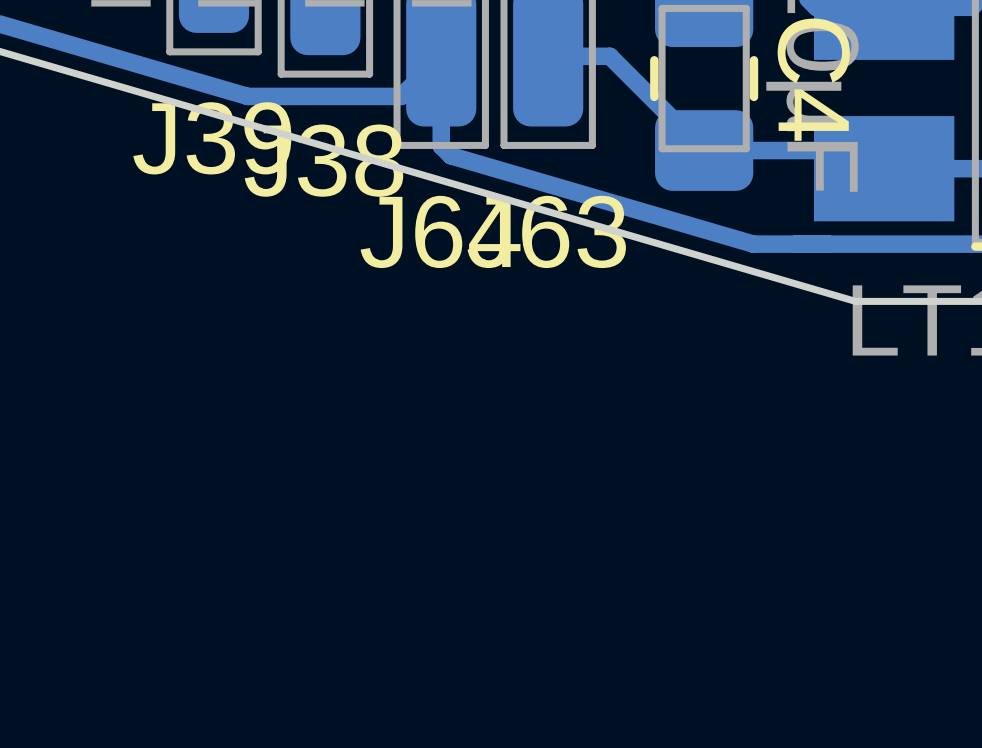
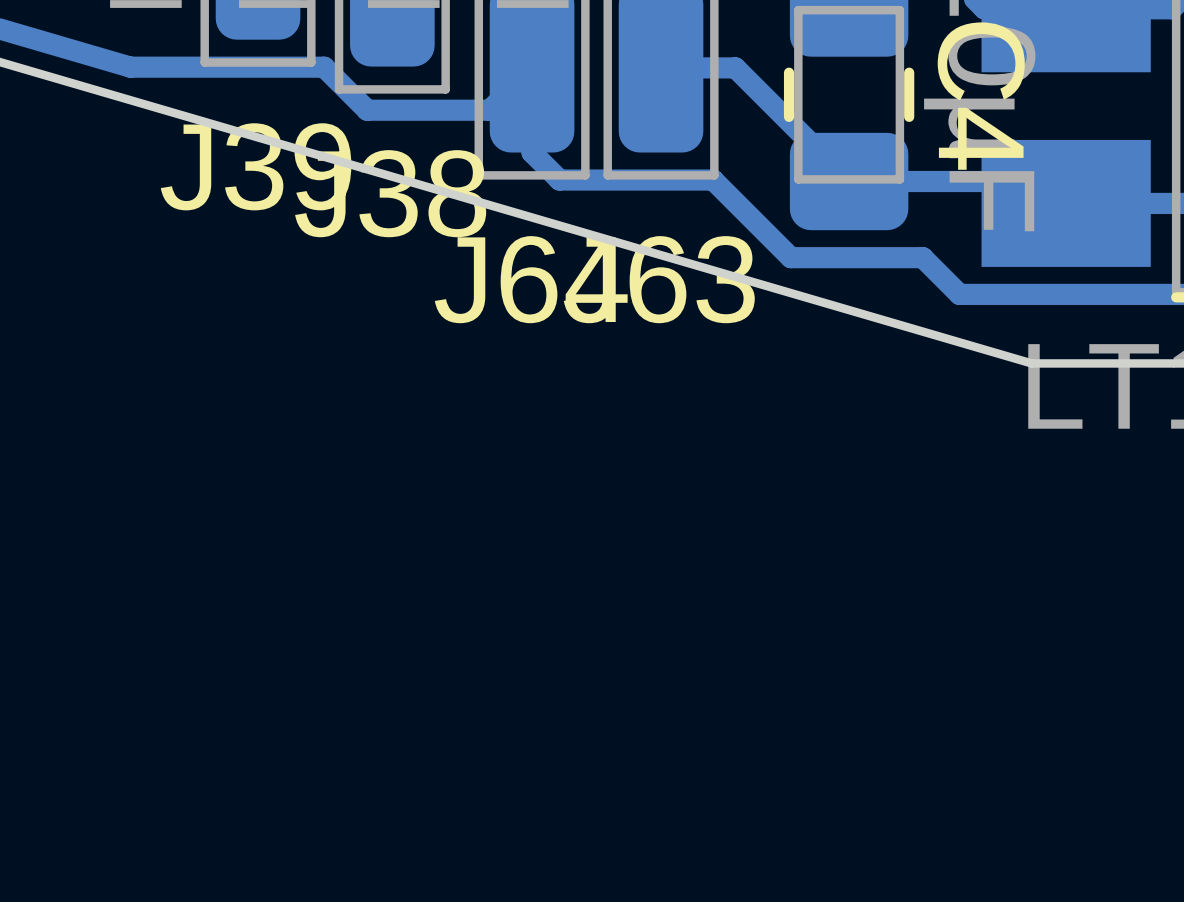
track: (108, 55) (247, 96) (401, 96) (406, 91) -> (130, 67) (324, 67) (367, 110) (489, 110)
track: (441, 126) (441, 146) (451, 155) (753, 244) (795, 244) -> (532, 152) (559, 180) (713, 180) (790, 257) (922, 257) (959, 294)

